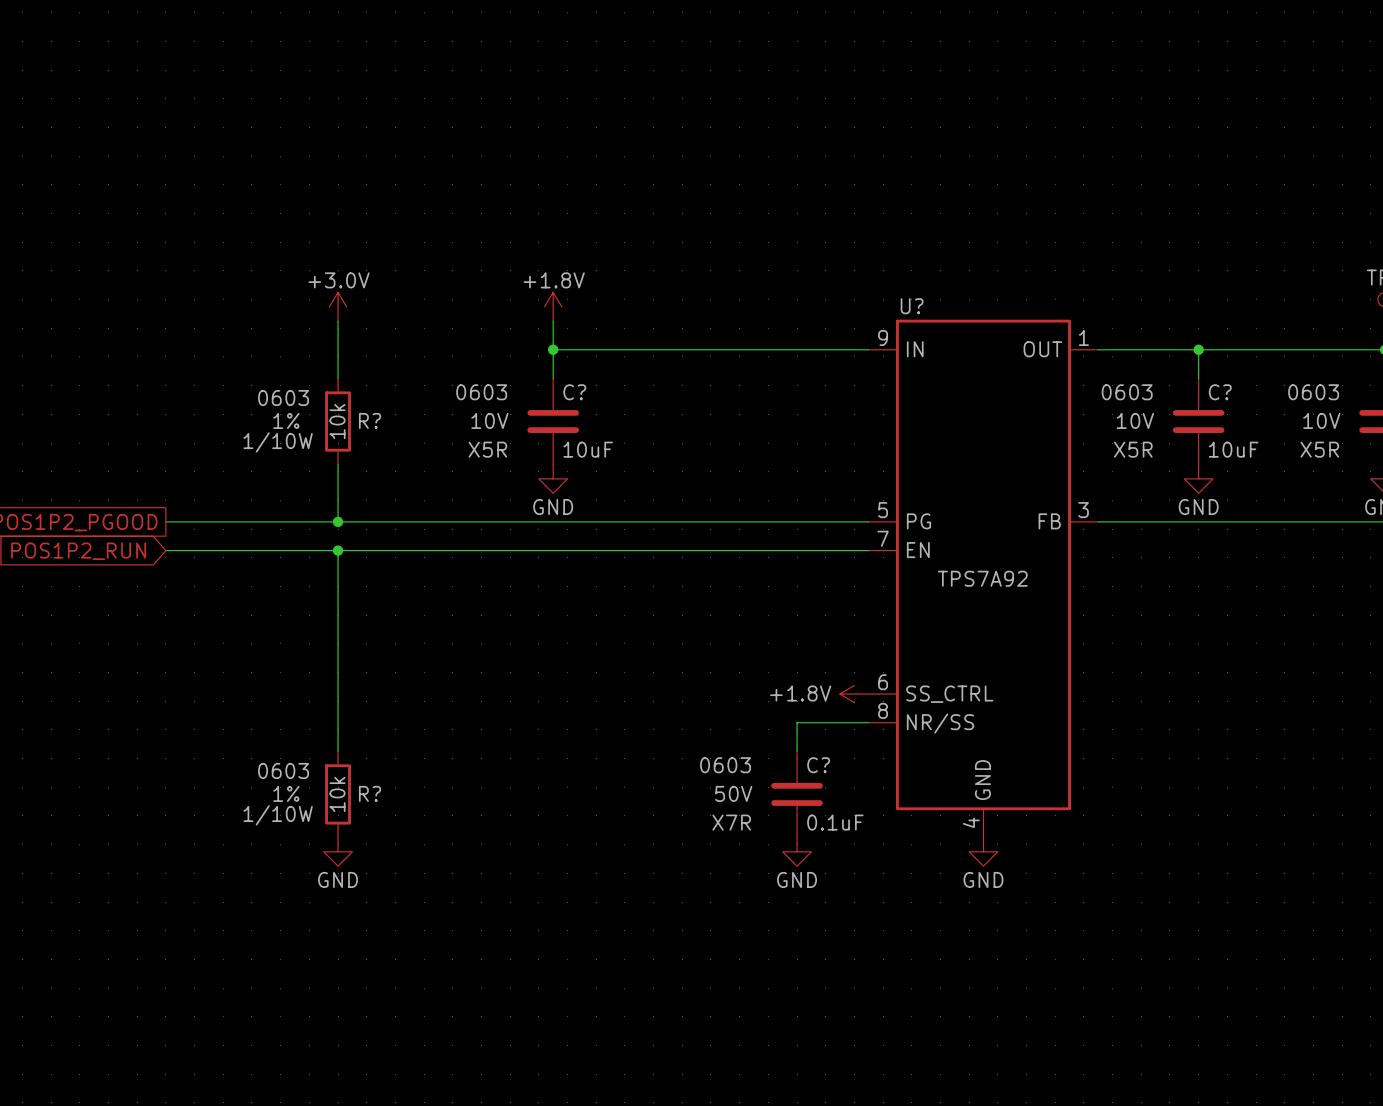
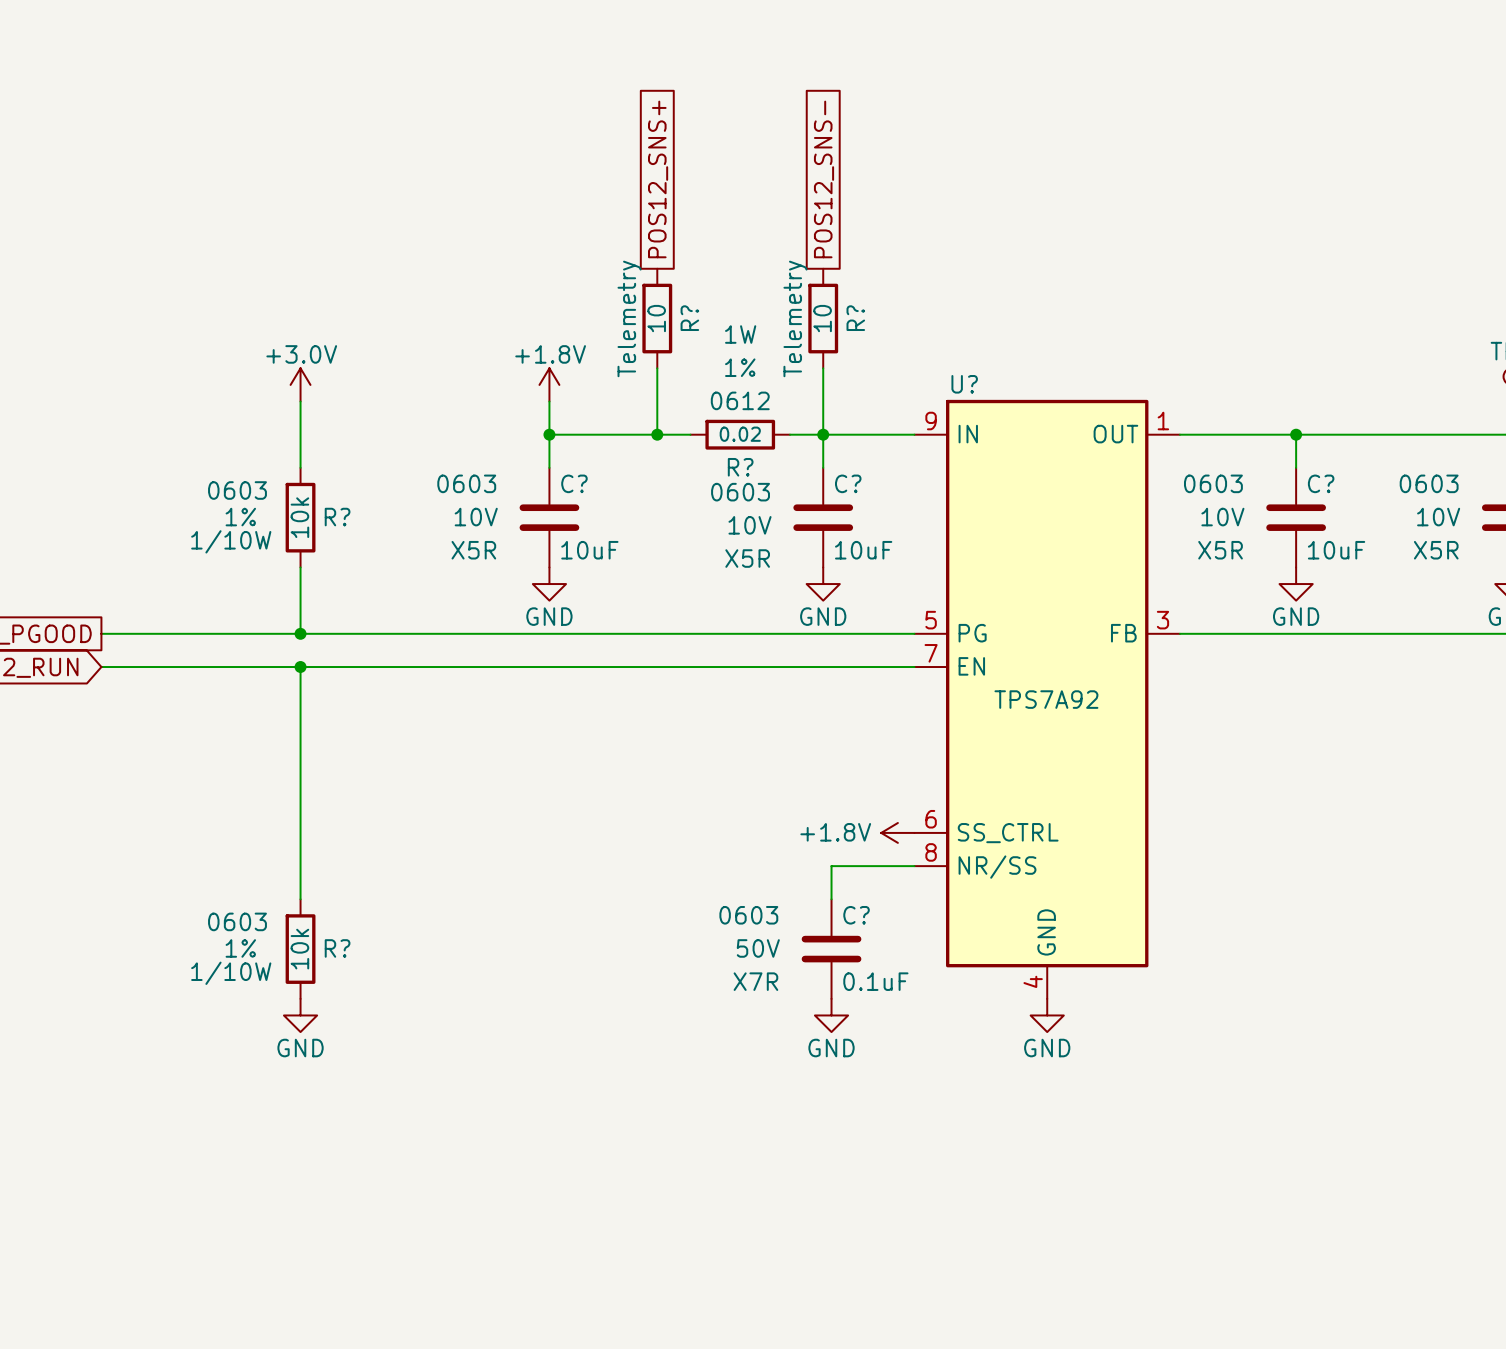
global label: none -> POS12_SNS+ (658, 179)
global label: none -> POS12_SNS- (824, 179)
R?: none -> 10 (657, 318)
R?: none -> 10 (823, 318)
wire: none -> (657, 368) (657, 434)
wire: none -> (823, 368) (823, 467)
junction: none -> (657, 434)
wire: (675, 349) (761, 349) -> none
R?: none -> 0.02 (740, 434)
junction: none -> (823, 434)
C?: none -> 10uF (823, 517)
power symbol: none -> GND (823, 584)

